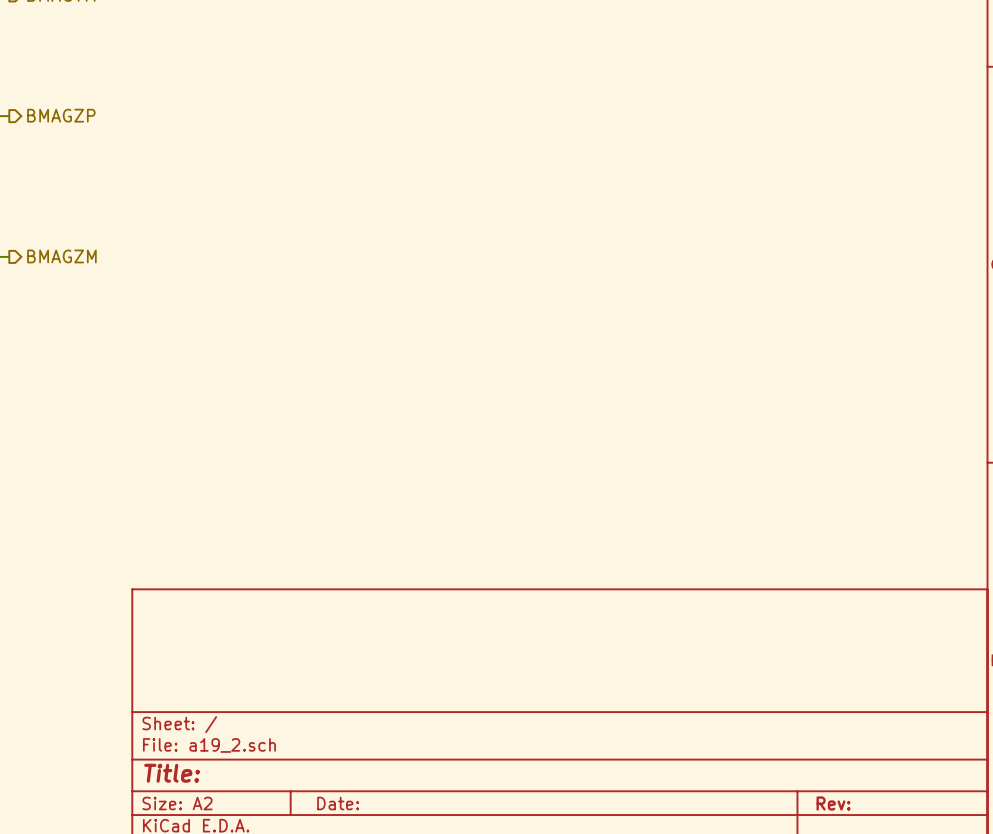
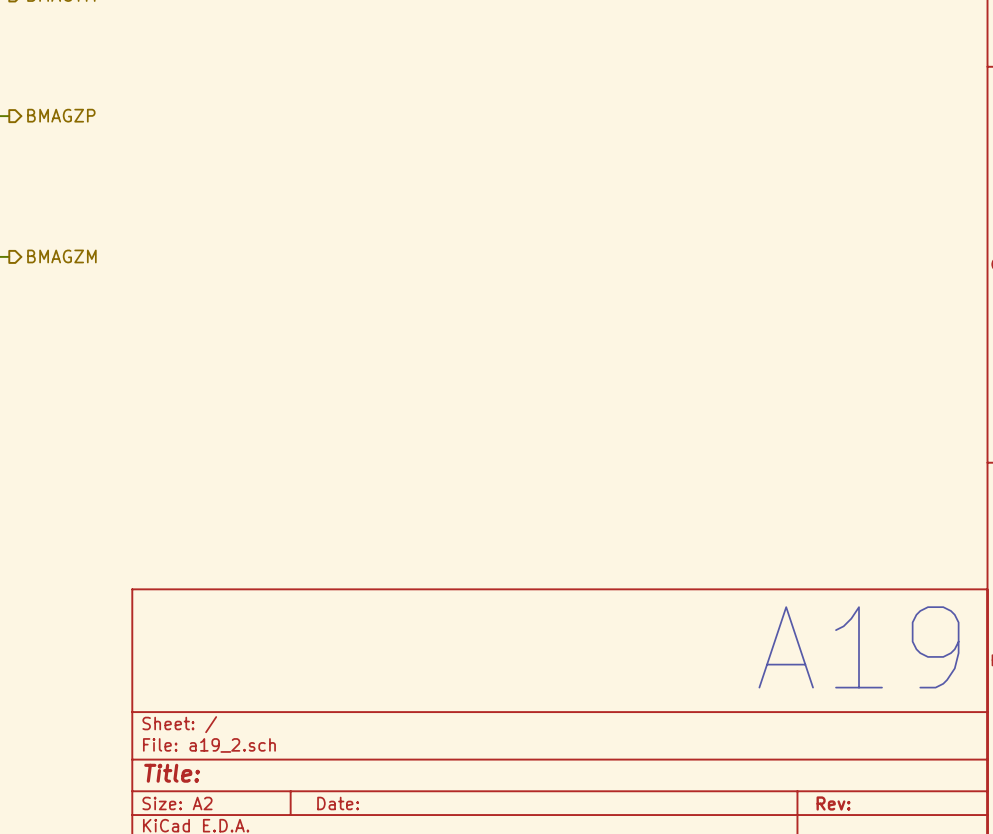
text: none -> A19 (859, 647)

